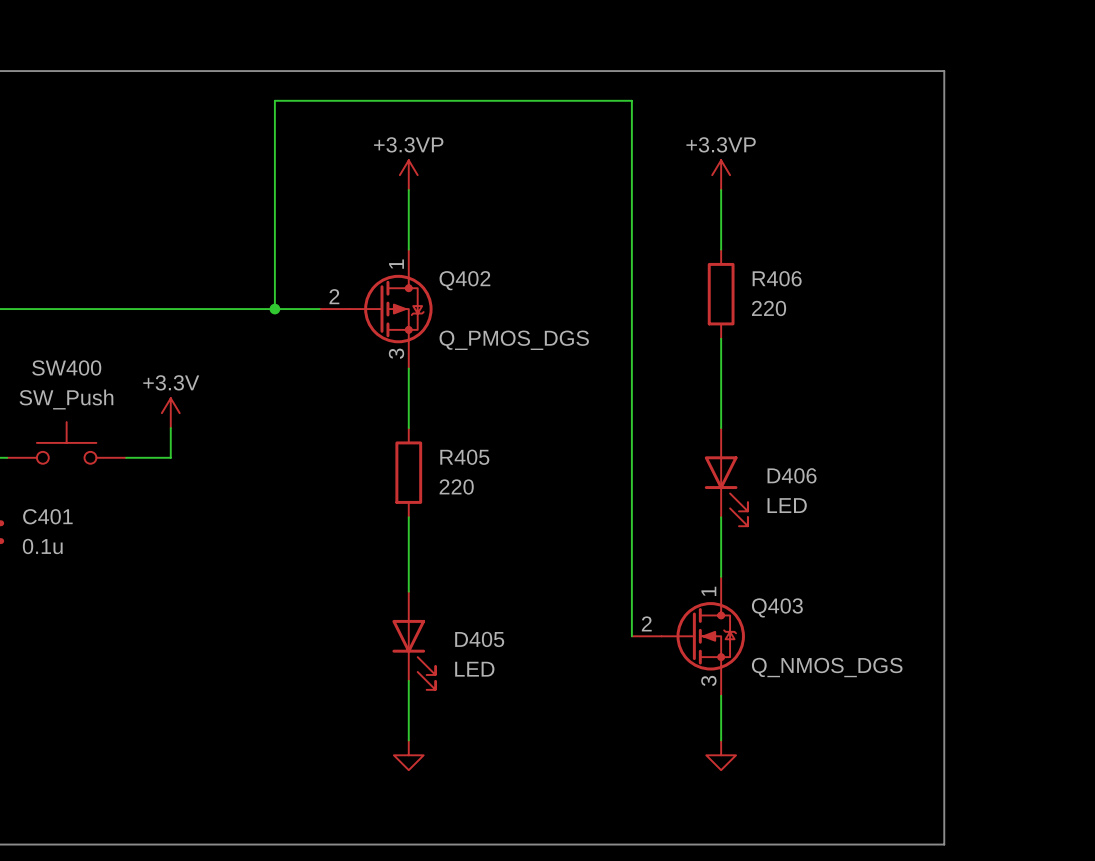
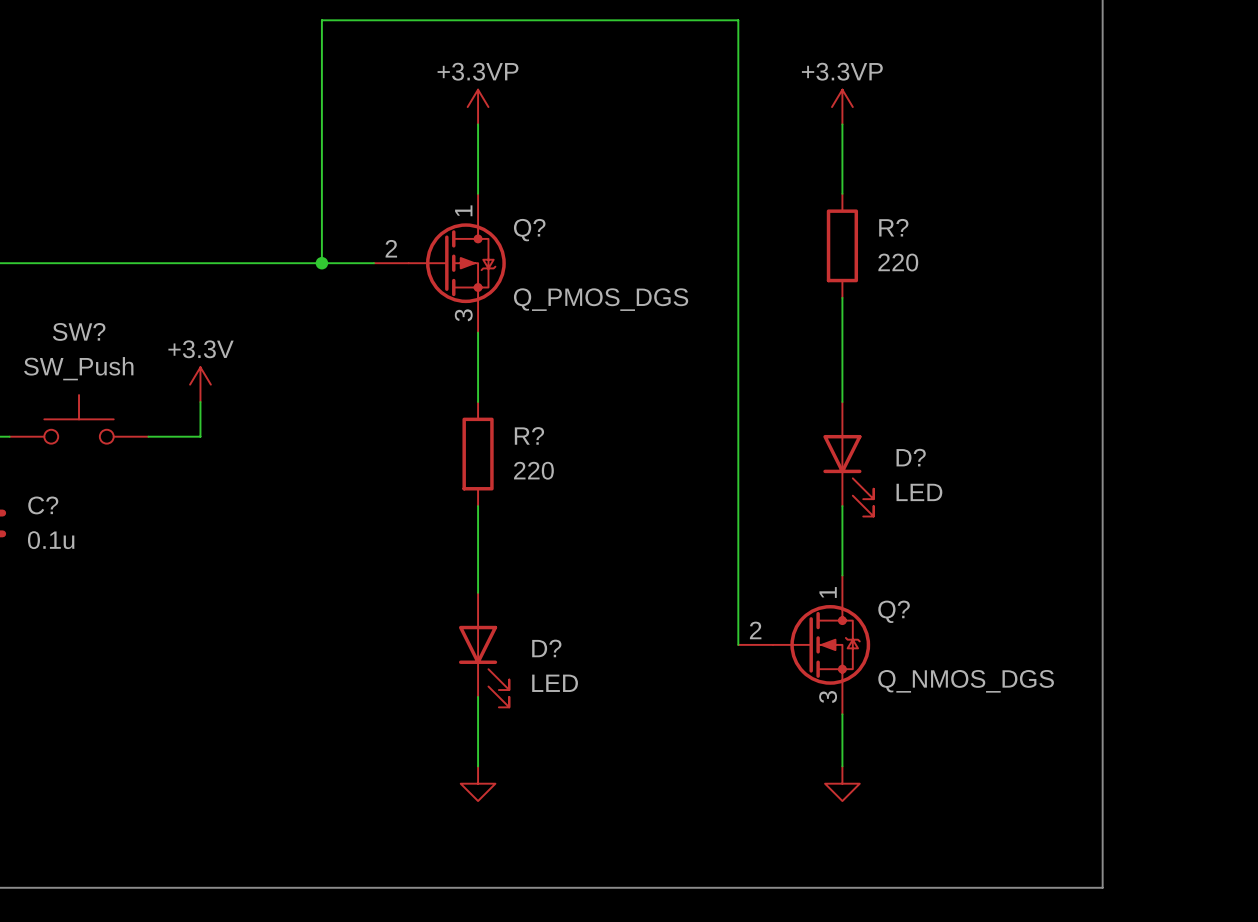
R406 name: R406 (777, 278) -> R? (893, 227)
Q402 name: Q402 (464, 280) -> Q? (529, 230)
SW400 name: SW400 (66, 367) -> SW? (79, 331)
R405 name: R405 (464, 457) -> R? (529, 435)
D406 name: D406 (792, 475) -> D? (911, 457)
C401 name: C401 (47, 516) -> C? (43, 505)
Q403 name: Q403 (777, 607) -> Q? (894, 611)
D405 name: D405 (479, 639) -> D? (546, 648)

